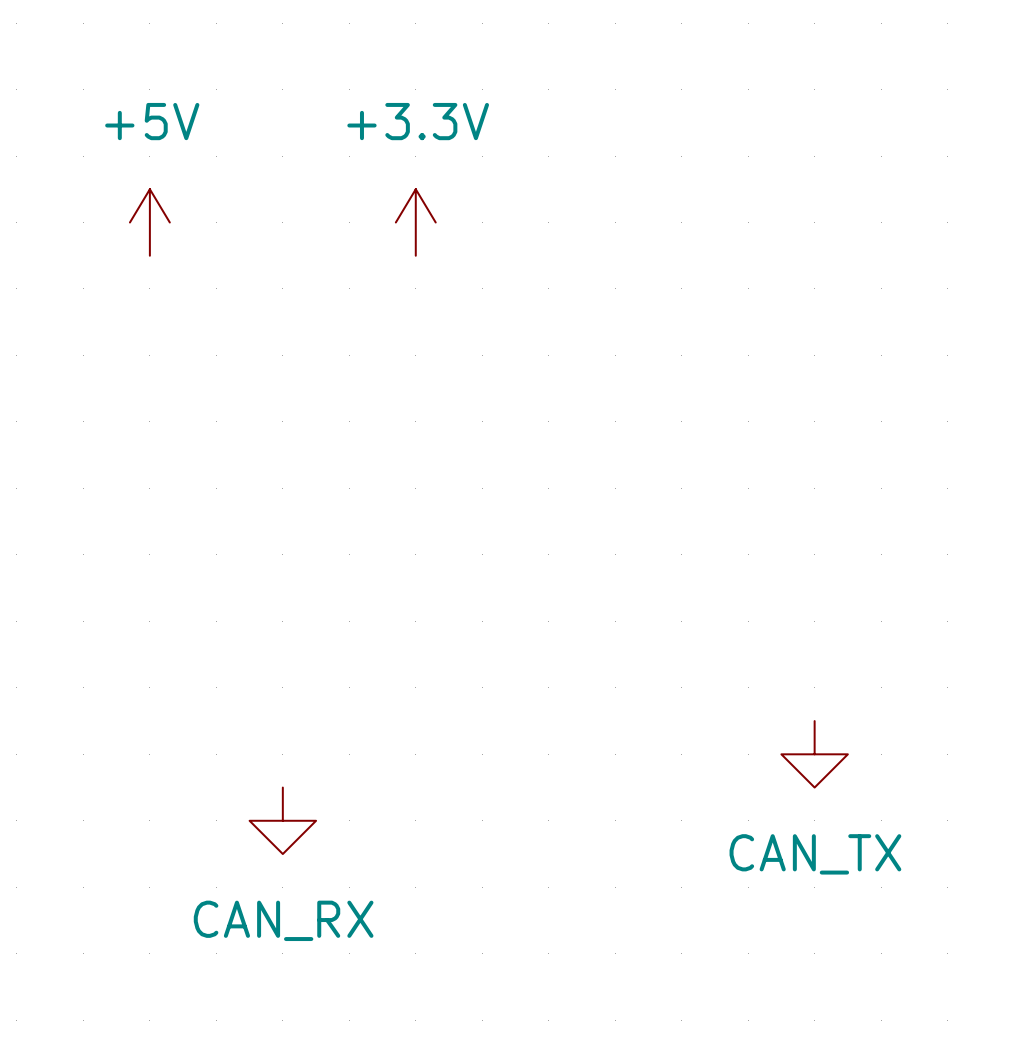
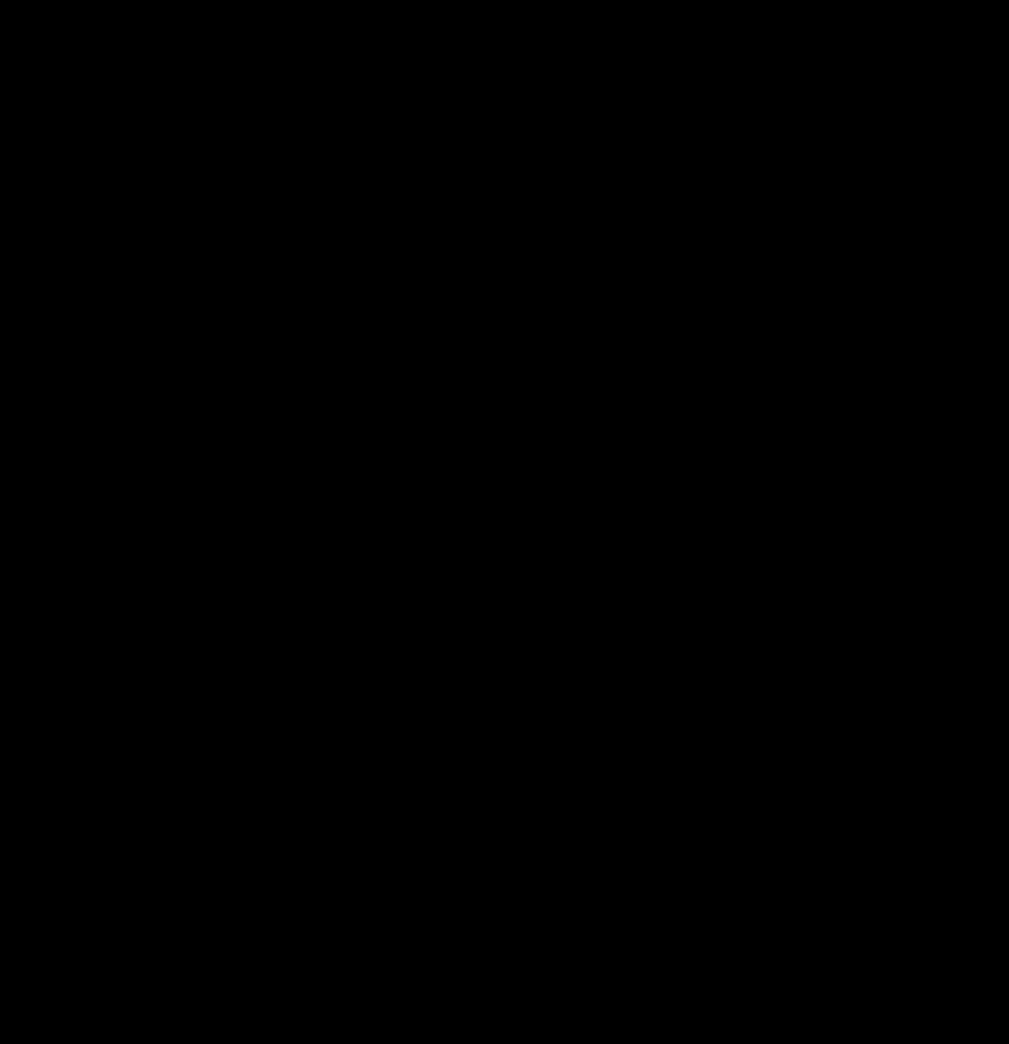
power symbol: +5V (149, 222) -> none
power symbol: +3.3V (415, 222) -> none
power symbol: CAN_TX (814, 754) -> none
power symbol: CAN_RX (282, 820) -> none

